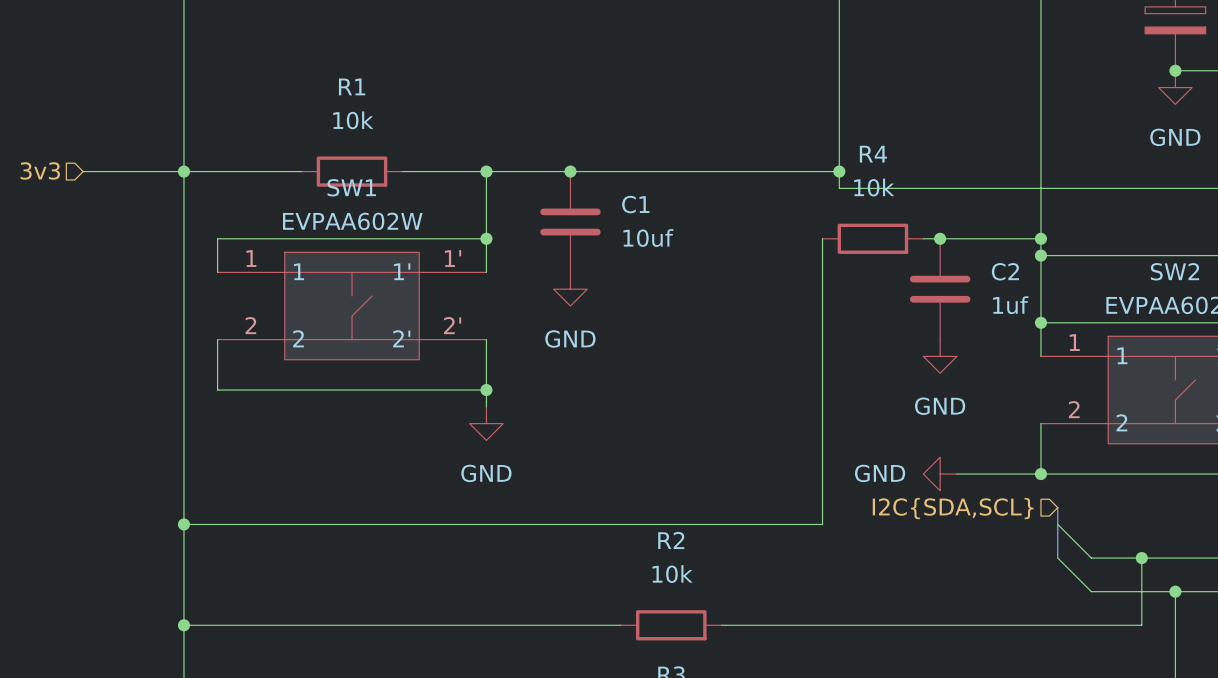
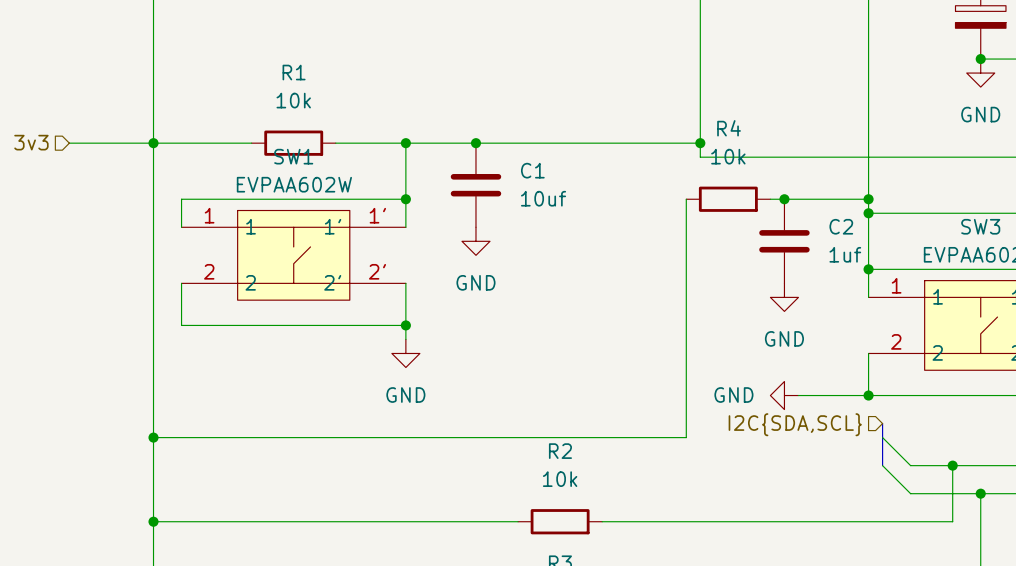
SW2 name: SW2 (1175, 271) -> SW3 (980, 226)

